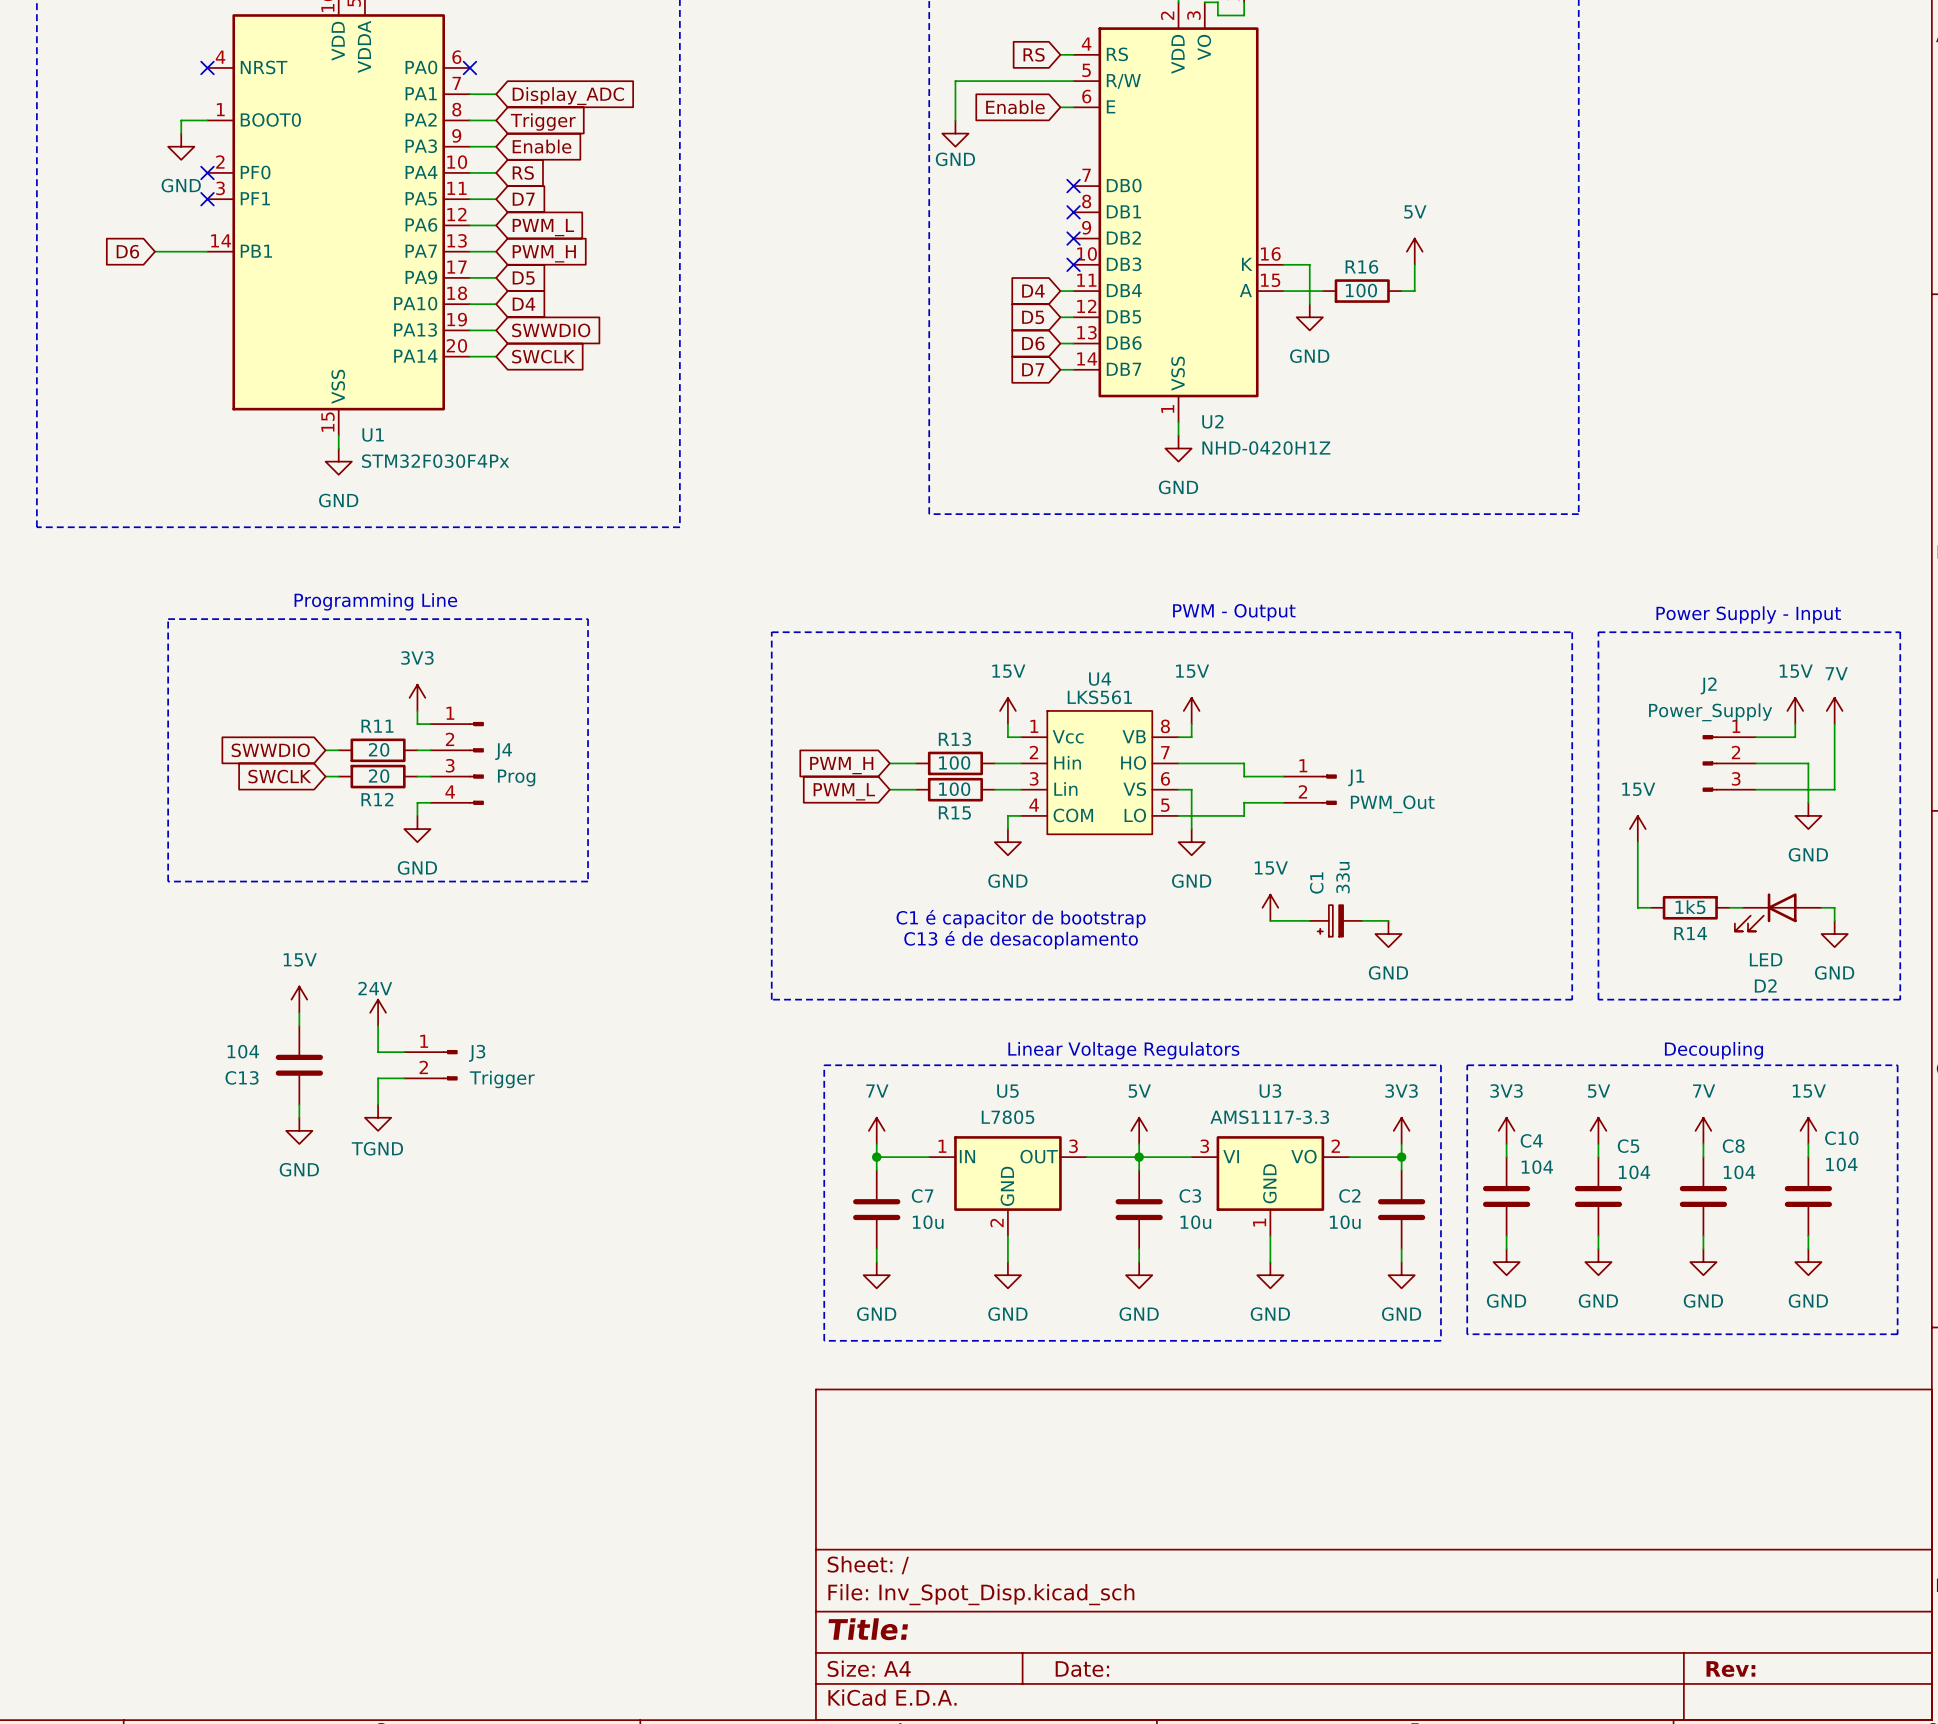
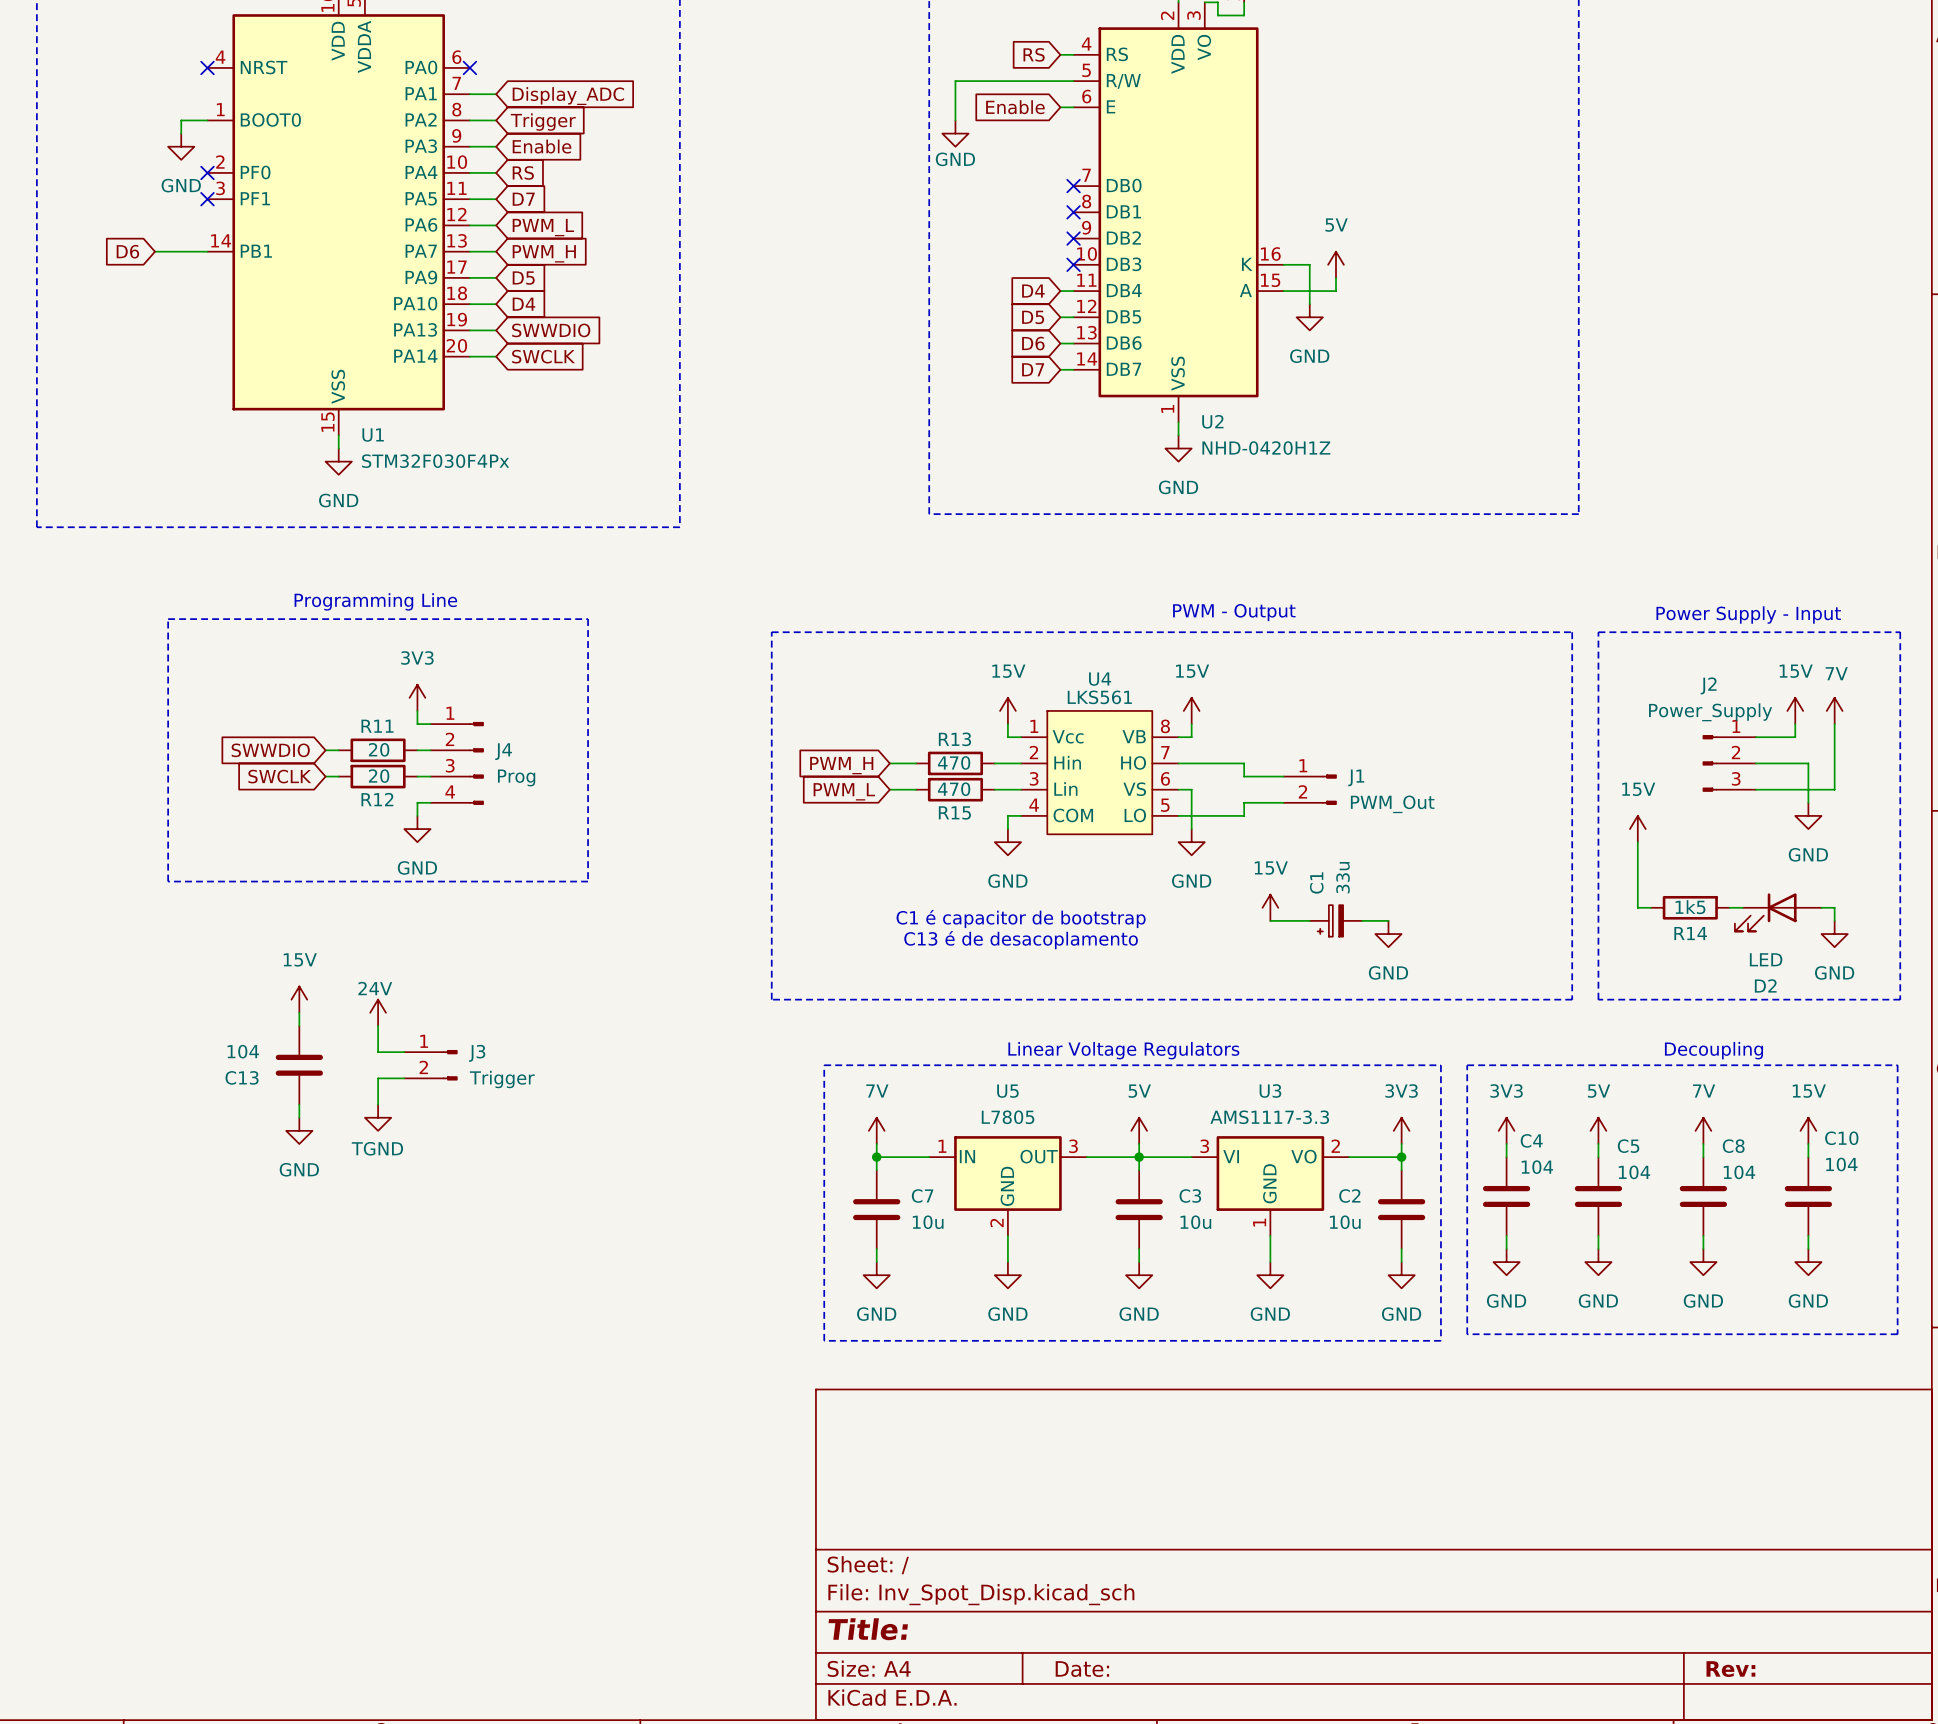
power symbol position: 5V (1414, 251) -> 5V (1336, 264)
wire: (1414, 264) (1414, 291) (1401, 291) -> none
R16: 100 (1362, 291) -> none
R13 value: 100 (954, 762) -> 470 (954, 762)
R15 value: 100 (954, 789) -> 470 (954, 789)

